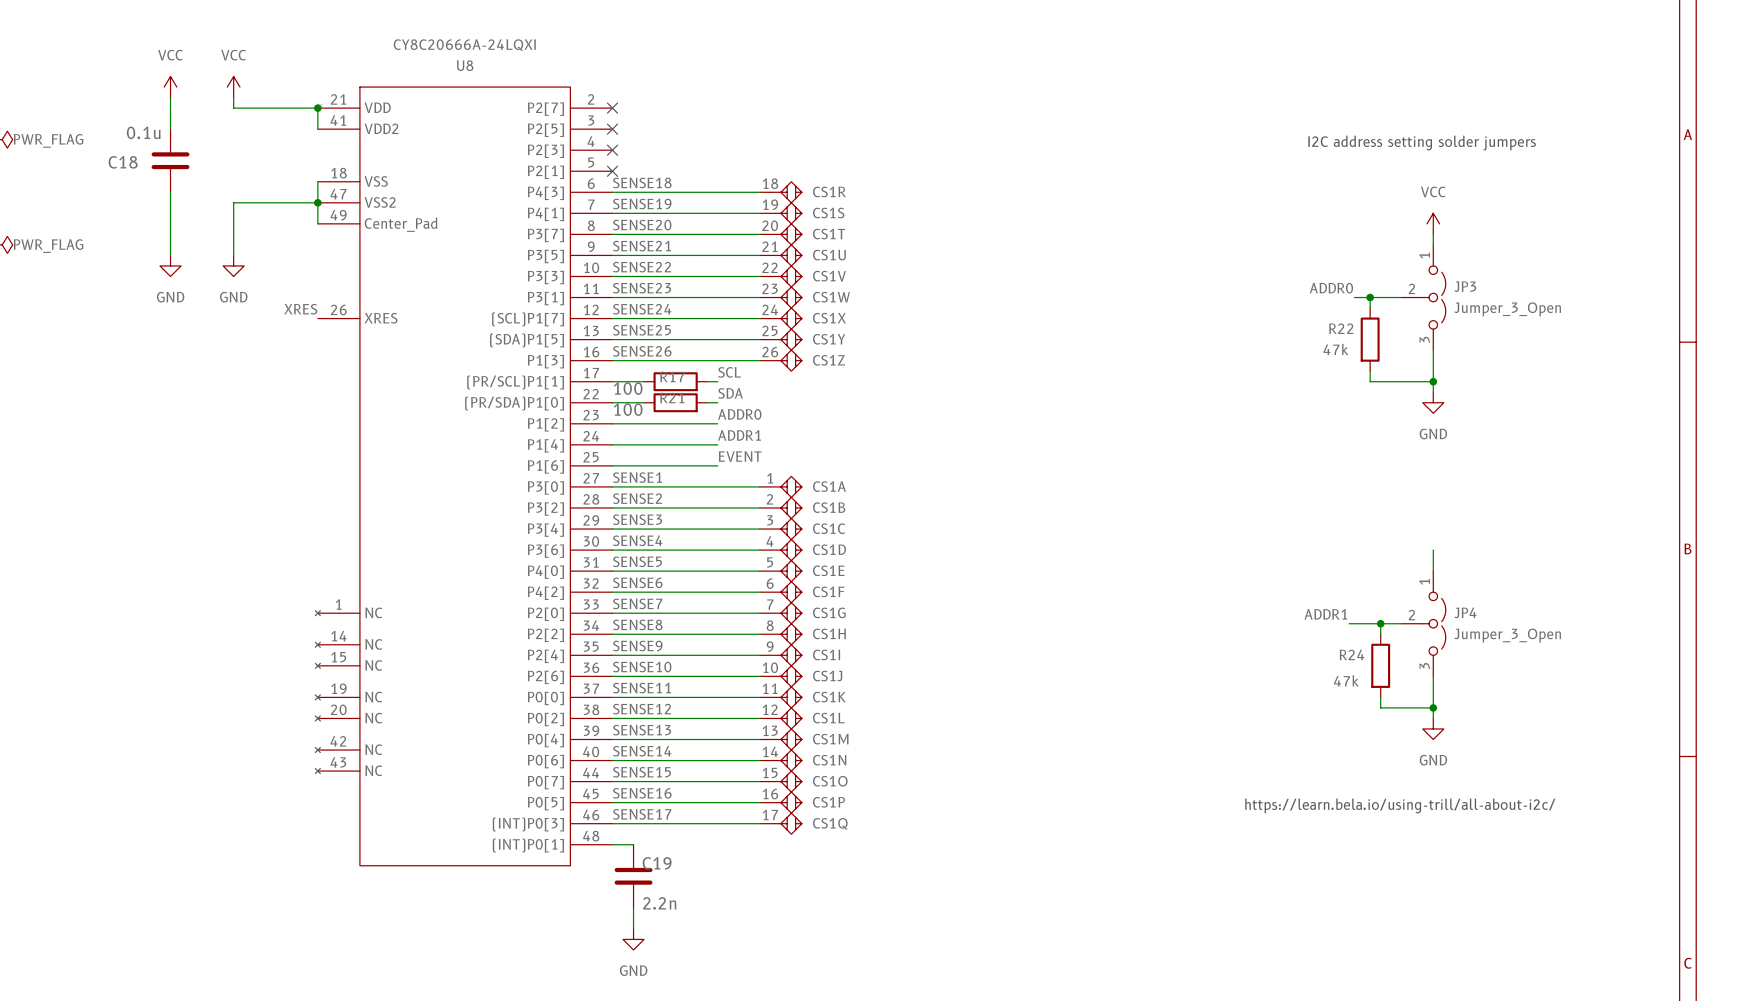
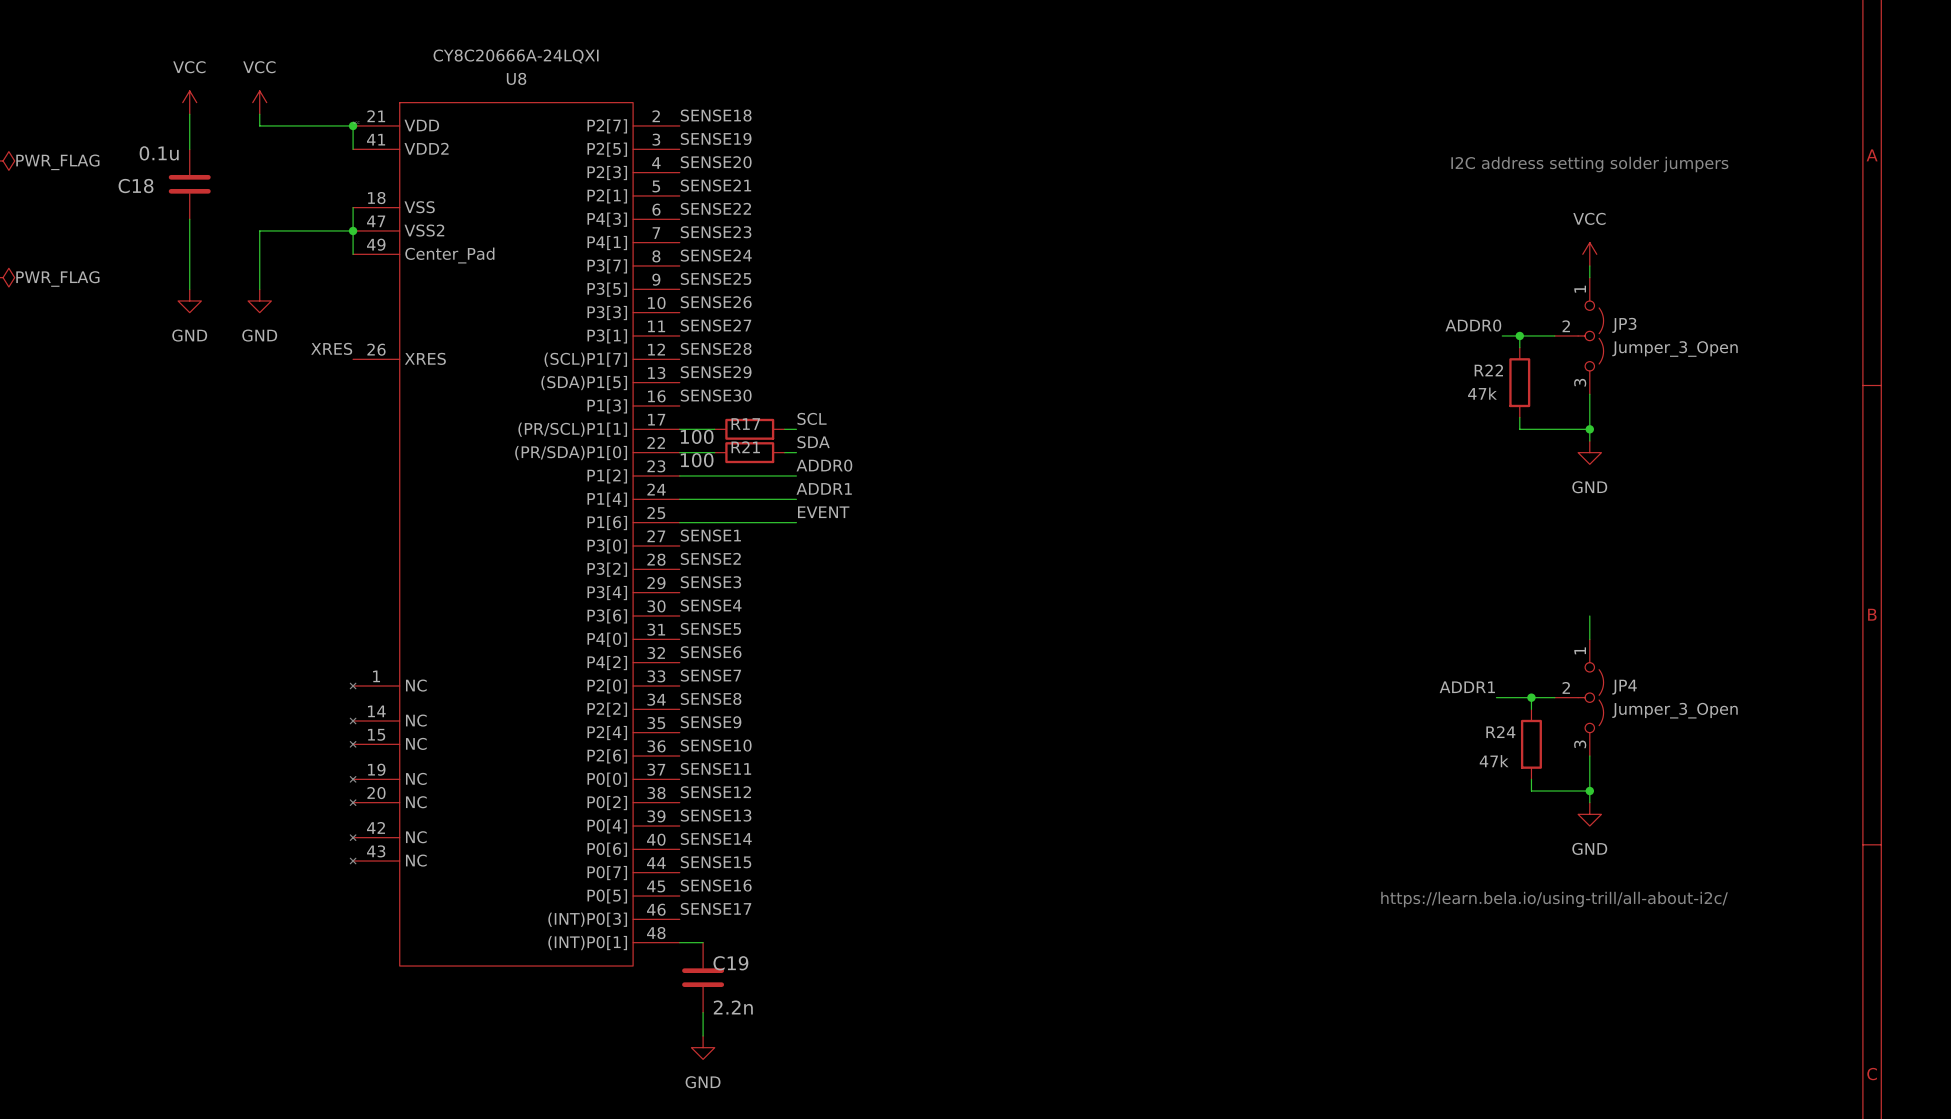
label: none -> SENSE18 (716, 115)
no-connect mark: (612, 108) -> none
label: none -> SENSE19 (716, 138)
no-connect mark: (612, 129) -> none
label: none -> SENSE20 (716, 162)
no-connect mark: (612, 150) -> none
label: none -> SENSE21 (715, 185)
no-connect mark: (612, 171) -> none
label: SENSE18 (642, 182) -> SENSE22 (715, 208)
wire: (612, 192) (759, 192) -> none
CS1R: (780, 192) -> none
label: SENSE19 (642, 204) -> SENSE23 (716, 232)
wire: (612, 213) (759, 213) -> none
CS1S: (780, 213) -> none
label: SENSE20 (642, 225) -> SENSE24 (716, 255)
wire: (612, 234) (759, 234) -> none
CS1T: (780, 234) -> none
label: SENSE21 (642, 246) -> SENSE25 (716, 278)
wire: (612, 255) (759, 255) -> none
CS1U: (780, 255) -> none
label: SENSE22 (642, 267) -> SENSE26 (716, 302)
wire: (612, 276) (759, 276) -> none
CS1V: (780, 276) -> none
label: SENSE23 (642, 288) -> SENSE27 (716, 325)
wire: (612, 297) (759, 297) -> none
CS1W: (780, 297) -> none
label: SENSE24 (642, 309) -> SENSE28 (716, 348)
wire: (612, 318) (759, 318) -> none
CS1X: (780, 318) -> none
label: SENSE25 (642, 330) -> SENSE29 (716, 372)
wire: (612, 339) (759, 339) -> none
CS1Y: (780, 339) -> none
label: SENSE26 (642, 351) -> SENSE30 (716, 395)
wire: (612, 360) (759, 360) -> none
CS1Z: (780, 360) -> none
wire: (612, 486) (759, 486) -> none
CS1A: (780, 486) -> none
wire: (612, 507) (759, 507) -> none
CS1B: (780, 507) -> none
wire: (612, 529) (759, 529) -> none
CS1C: (780, 529) -> none
wire: (612, 550) (759, 550) -> none
CS1D: (780, 550) -> none
wire: (612, 571) (759, 571) -> none
CS1E: (780, 571) -> none
wire: (612, 592) (759, 592) -> none
CS1F: (780, 592) -> none
wire: (612, 613) (759, 613) -> none
CS1G: (780, 613) -> none
wire: (612, 634) (759, 634) -> none
CS1H: (780, 634) -> none
wire: (612, 655) (759, 655) -> none
CS1I: (780, 655) -> none
wire: (612, 676) (759, 676) -> none
CS1J: (780, 676) -> none
wire: (612, 697) (759, 697) -> none
CS1K: (780, 697) -> none
wire: (612, 718) (759, 718) -> none
CS1L: (780, 718) -> none
wire: (612, 739) (759, 739) -> none
CS1M: (780, 739) -> none
wire: (612, 760) (759, 760) -> none
CS1N: (780, 760) -> none
wire: (612, 781) (759, 781) -> none
CS1O: (780, 781) -> none
wire: (612, 802) (759, 802) -> none
CS1P: (780, 802) -> none
wire: (612, 823) (759, 823) -> none
CS1Q: (780, 823) -> none

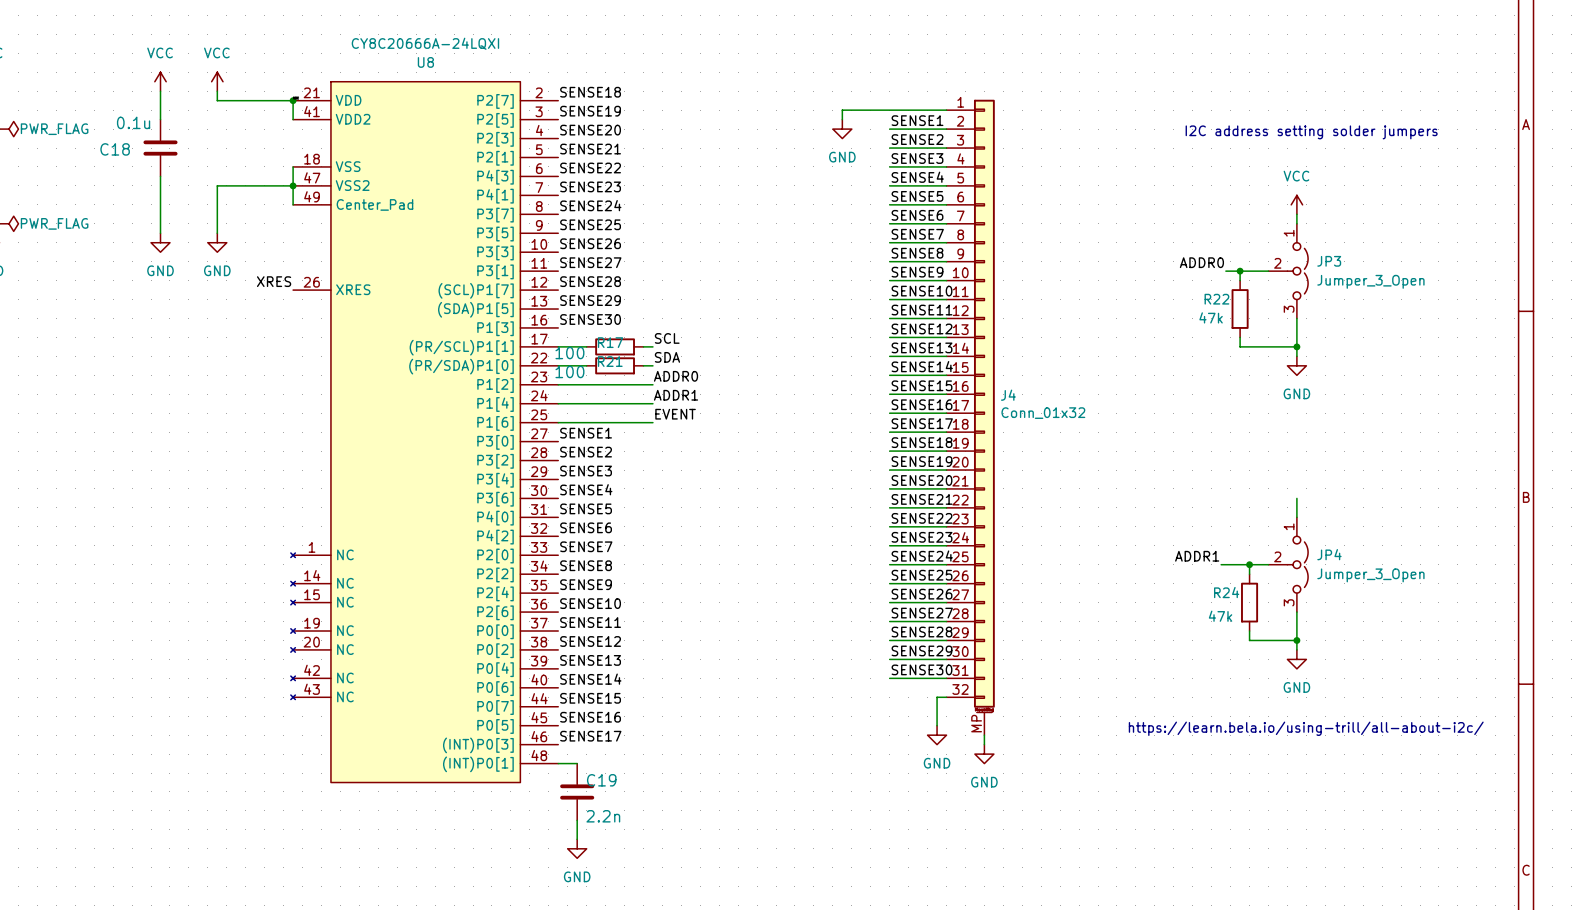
wire: none -> (946, 110) (842, 110) (842, 119)
label: none -> SENSE1 (917, 120)
power symbol: none -> GND (842, 129)
wire: none -> (889, 129) (946, 129)
label: none -> SENSE2 (917, 139)
wire: none -> (889, 148) (946, 148)
label: none -> SENSE3 (917, 158)
wire: none -> (889, 166) (946, 166)
label: none -> SENSE4 (917, 177)
wire: none -> (889, 185) (946, 185)
label: none -> SENSE5 (917, 196)
wire: none -> (889, 204) (946, 204)
label: none -> SENSE6 (917, 215)
wire: none -> (889, 223) (946, 223)
label: none -> SENSE7 (917, 234)
wire: none -> (889, 242) (946, 242)
label: none -> SENSE8 (917, 253)
wire: none -> (889, 261) (946, 261)
label: none -> SENSE9 (917, 272)
wire: none -> (889, 280) (946, 280)
label: none -> SENSE10 (922, 291)
wire: none -> (889, 299) (946, 299)
label: none -> SENSE11 (922, 310)
wire: none -> (889, 318) (946, 318)
label: none -> SENSE12 (922, 328)
wire: none -> (889, 337) (946, 337)
label: none -> SENSE13 (922, 347)
wire: none -> (889, 356) (946, 356)
label: none -> SENSE14 (922, 366)
wire: none -> (889, 375) (946, 375)
label: none -> SENSE15 (922, 385)
wire: none -> (889, 394) (946, 394)
label: none -> SENSE16 (922, 404)
wire: none -> (889, 413) (946, 413)
J4: none -> Conn_01x32 (970, 417)
label: none -> SENSE17 (922, 423)
wire: none -> (889, 432) (946, 432)
label: none -> SENSE18 (922, 442)
wire: none -> (889, 451) (946, 451)
label: none -> SENSE19 (922, 461)
wire: none -> (889, 470) (946, 470)
label: none -> SENSE20 (922, 480)
wire: none -> (889, 488) (946, 488)
label: none -> SENSE21 (922, 499)
wire: none -> (889, 507) (946, 507)
label: none -> SENSE22 (922, 518)
wire: none -> (889, 526) (946, 526)
label: none -> SENSE23 (922, 537)
wire: none -> (889, 545) (946, 545)
label: none -> SENSE24 (922, 556)
wire: none -> (889, 564) (946, 564)
label: none -> SENSE25 (922, 575)
wire: none -> (889, 583) (946, 583)
label: none -> SENSE26 (922, 594)
wire: none -> (889, 602) (946, 602)
label: none -> SENSE27 (922, 613)
wire: none -> (889, 621) (946, 621)
label: none -> SENSE28 (922, 632)
wire: none -> (889, 640) (946, 640)
label: none -> SENSE29 (922, 650)
wire: none -> (889, 659) (946, 659)
label: none -> SENSE30 (922, 669)
wire: none -> (889, 678) (946, 678)
wire: none -> (946, 697) (937, 697) (937, 725)
power symbol: none -> GND (937, 735)
wire: none -> (984, 735) (984, 744)
power symbol: none -> GND (984, 754)

